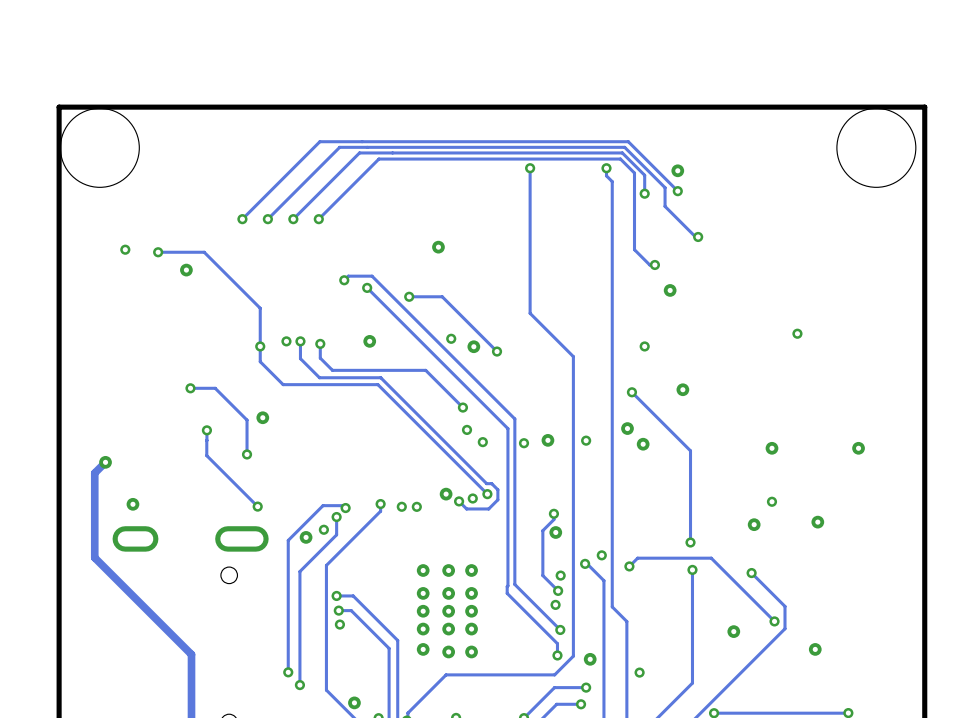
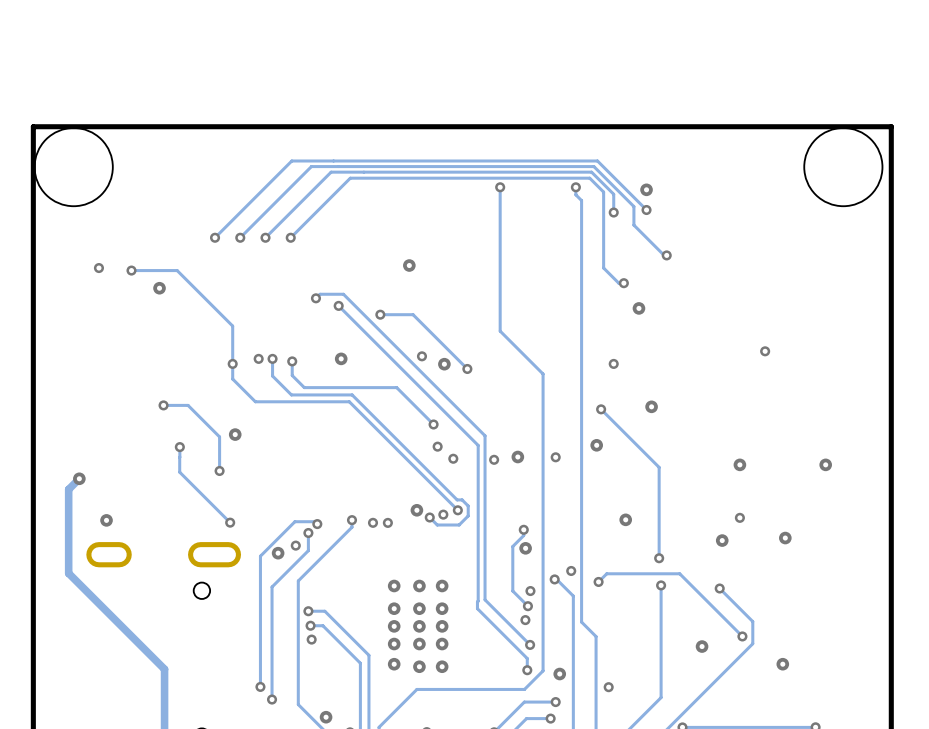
via position: (643, 444) -> (625, 519)

